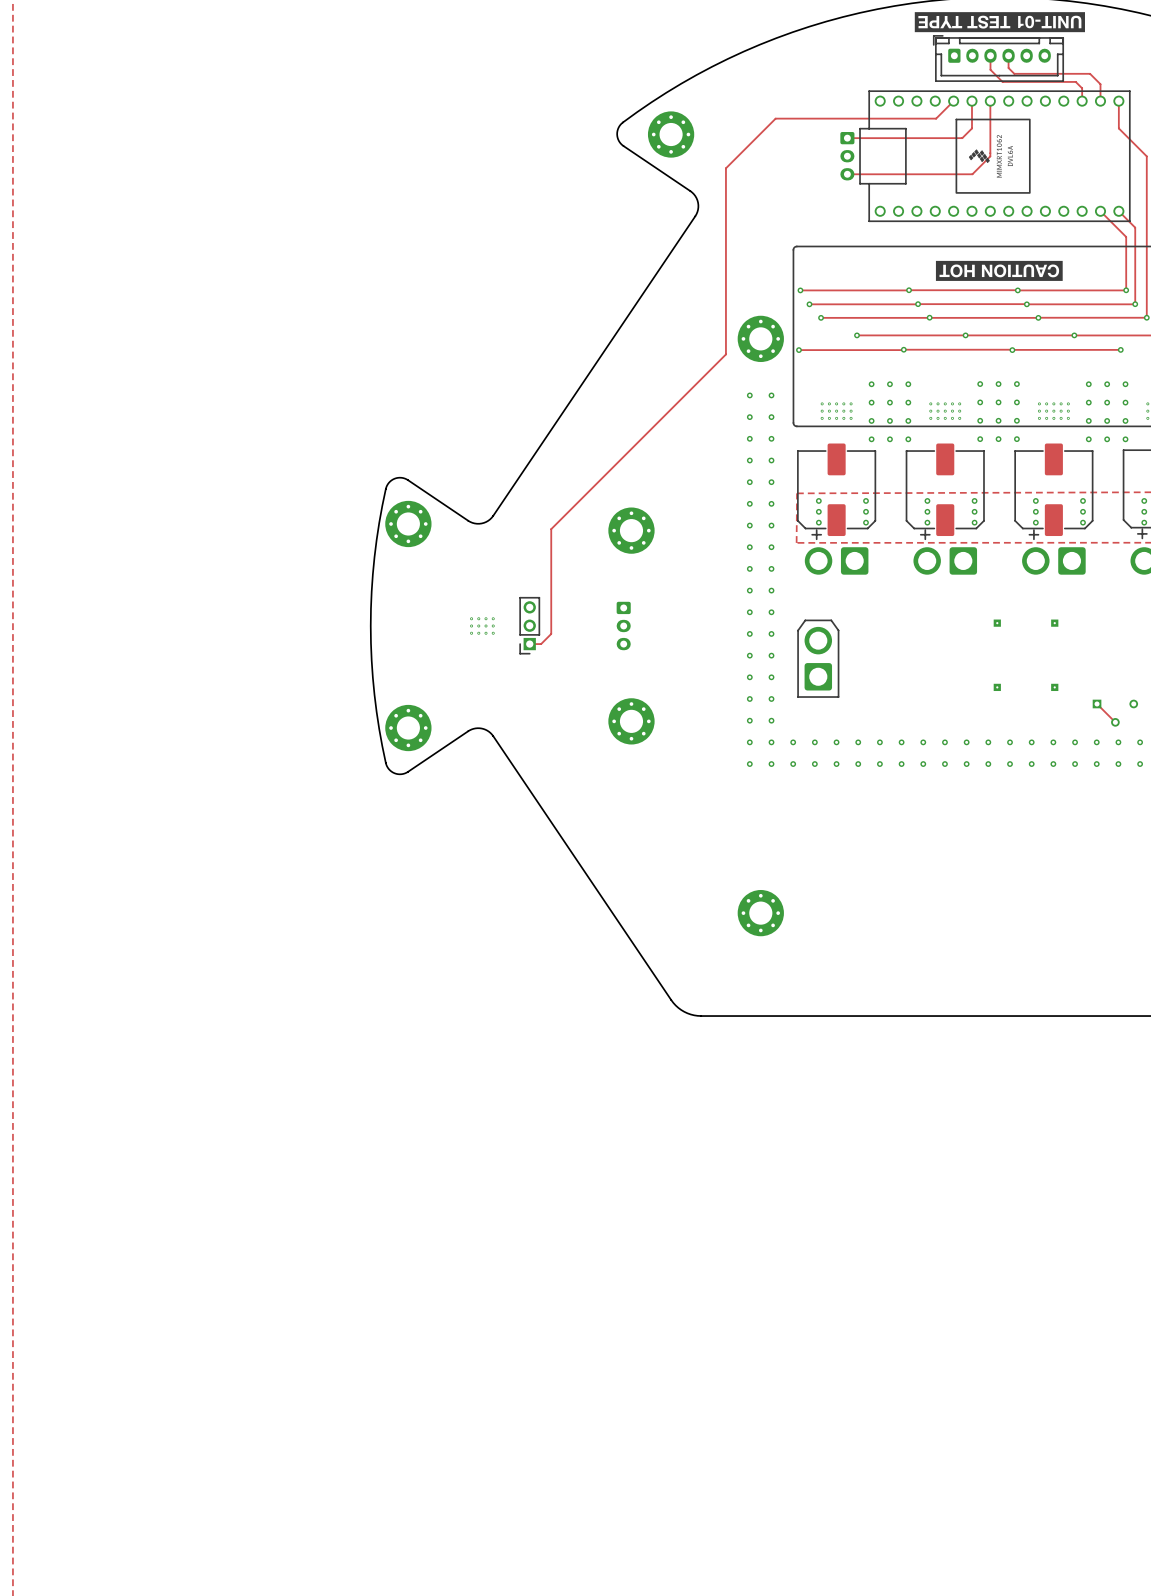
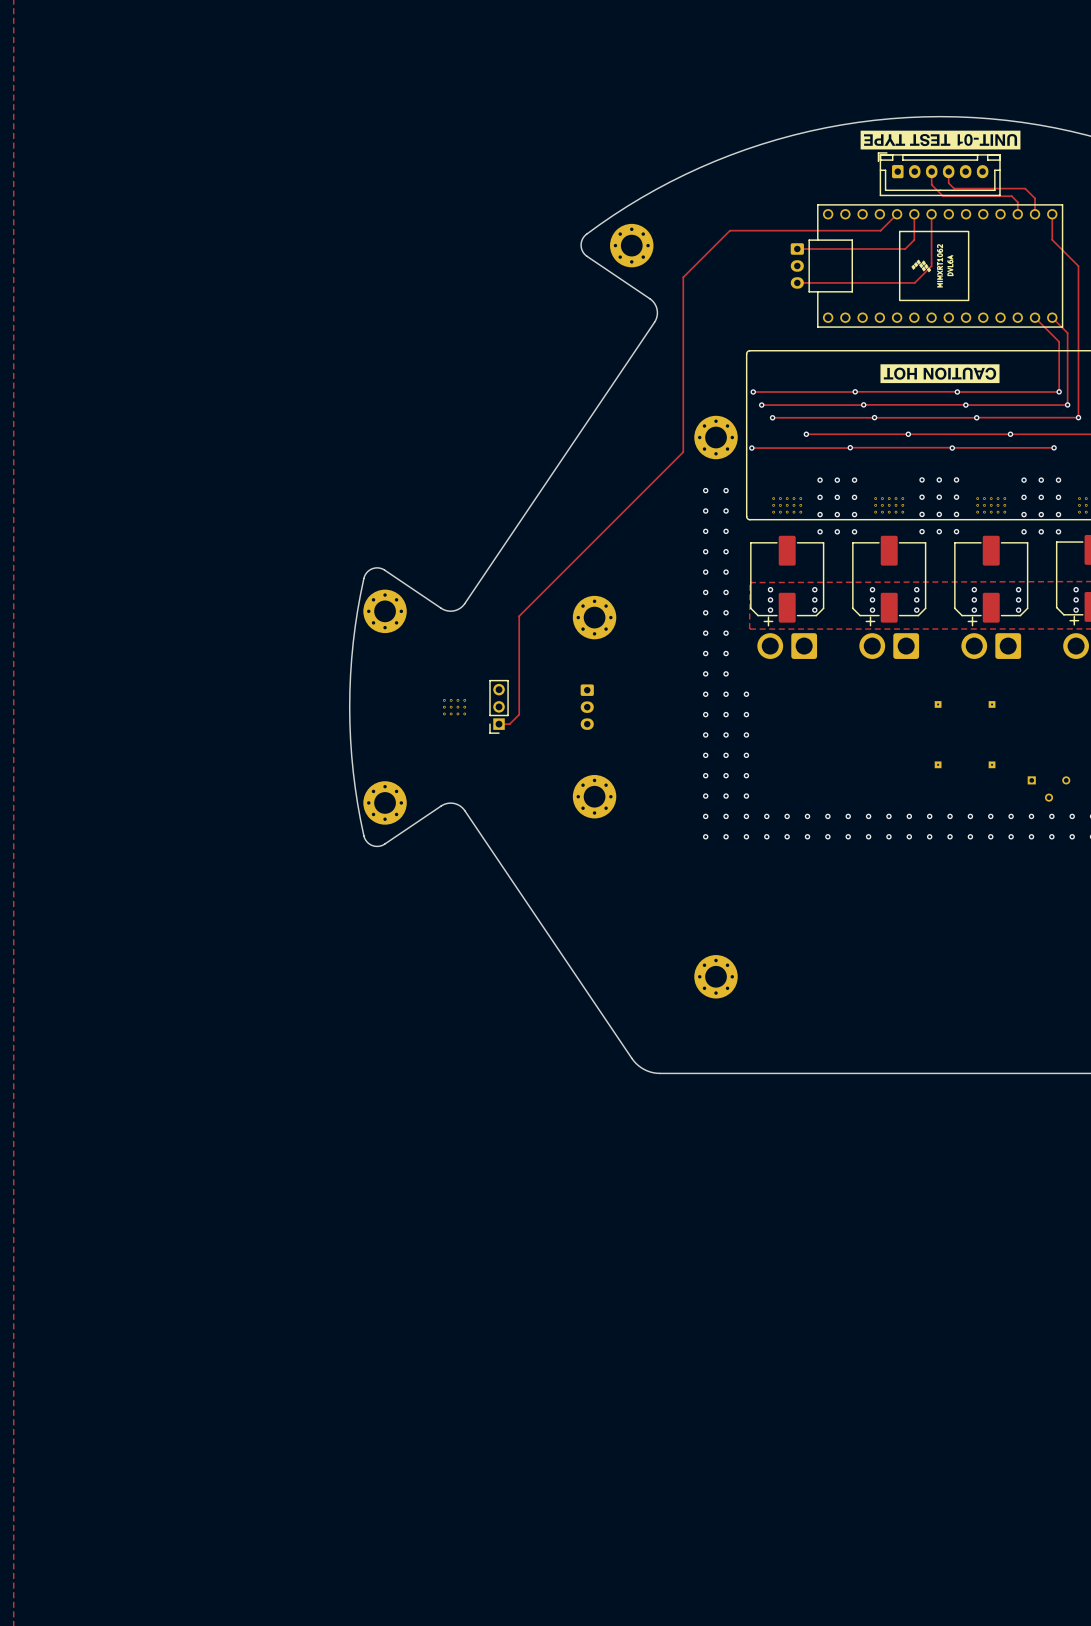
via: none -> (746, 694)
via: none -> (746, 714)
via: none -> (746, 734)
part: (818, 658) -> none
via: none -> (746, 755)
via: none -> (746, 775)
track: (1097, 703) (1115, 722) -> none
via: none -> (746, 796)

